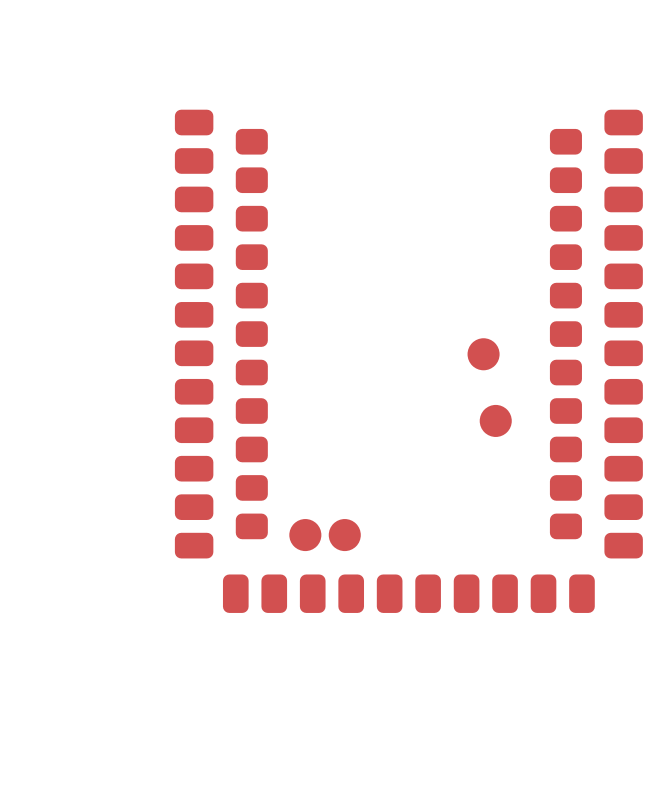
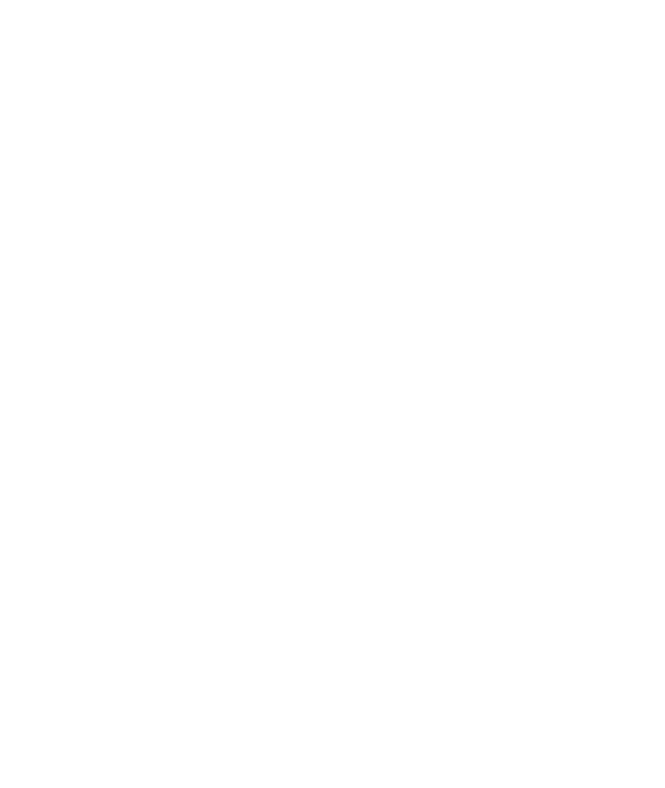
part: (408, 361) -> none

